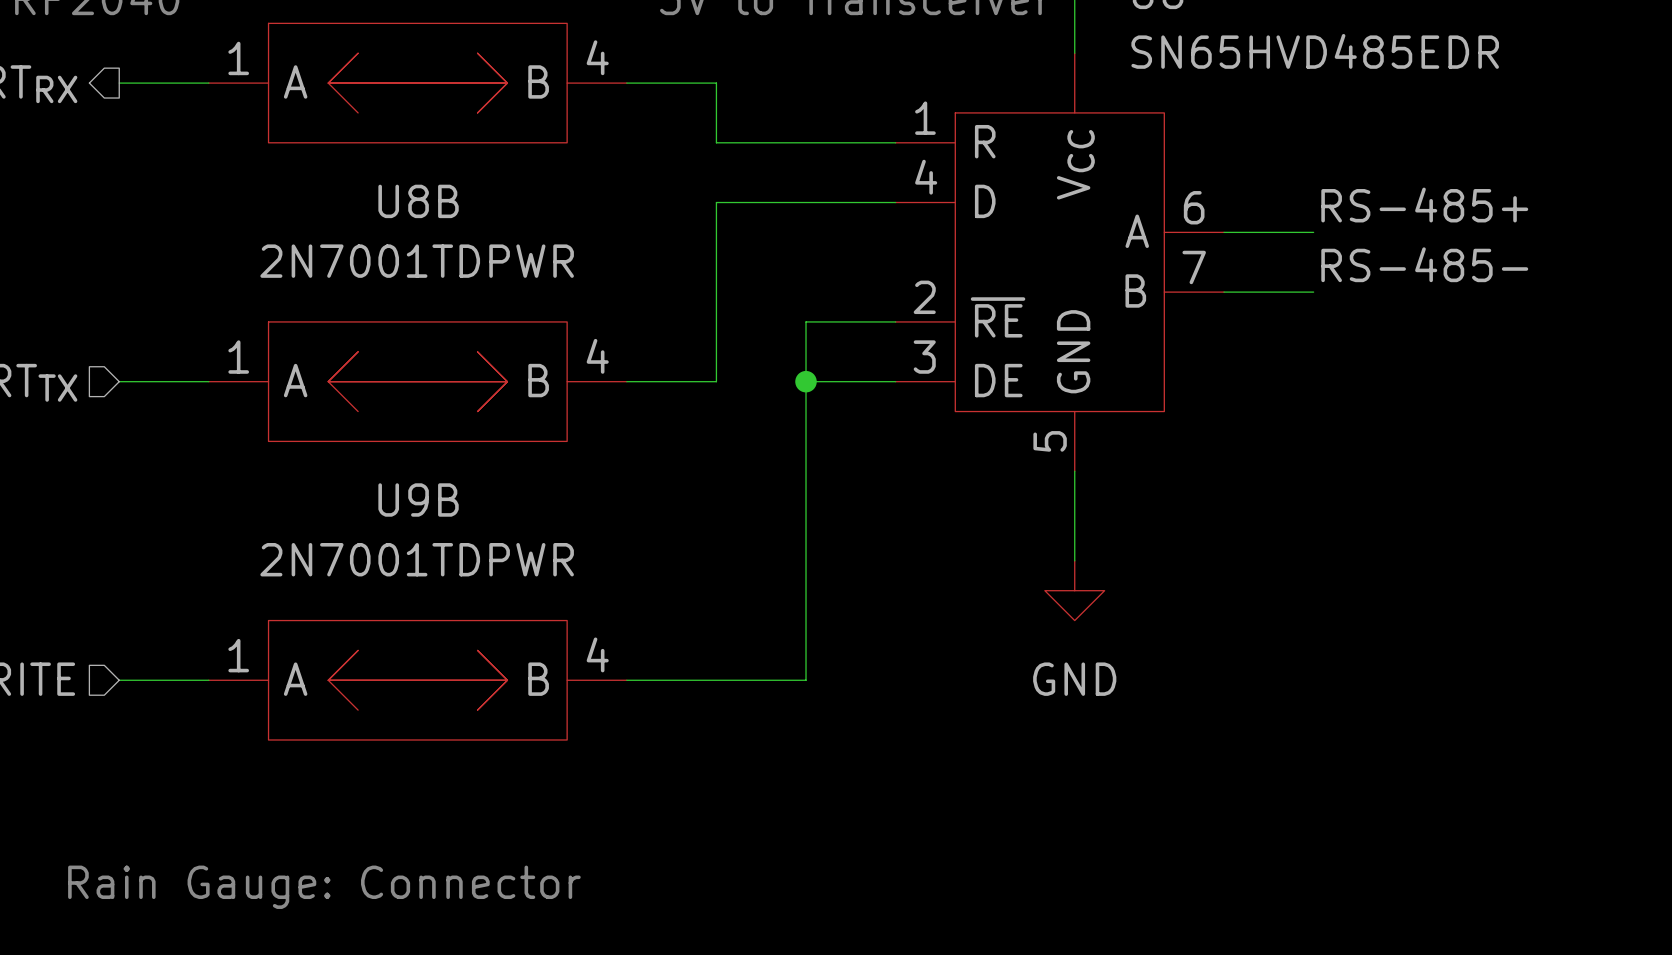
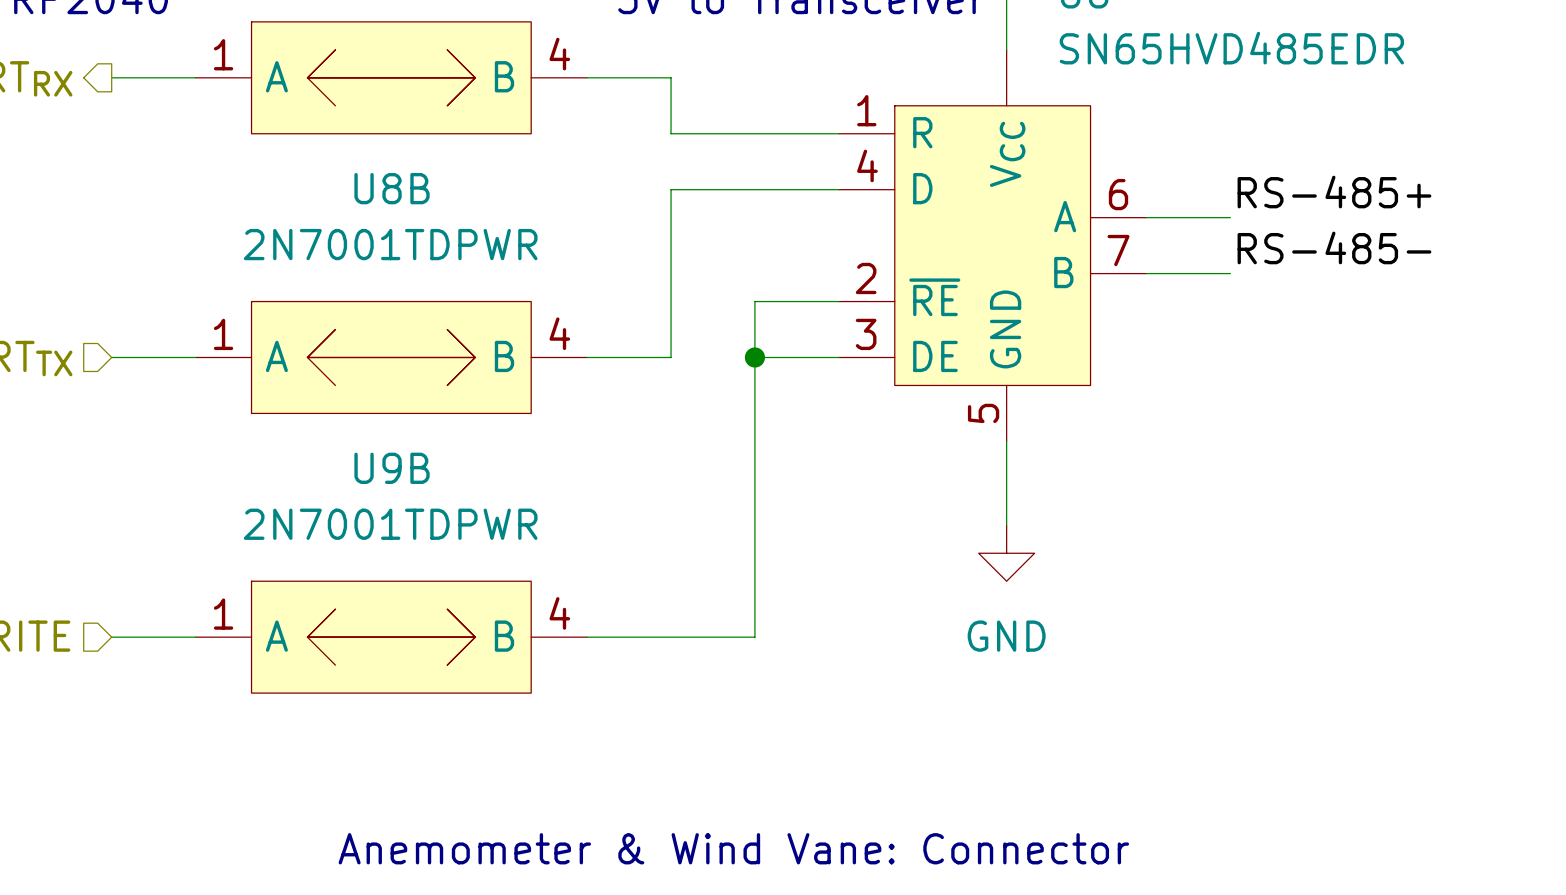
text: Rain Gauge: Connector (324, 887) -> none
text: none -> Anemometer & Wind Vane: Connector (733, 848)

